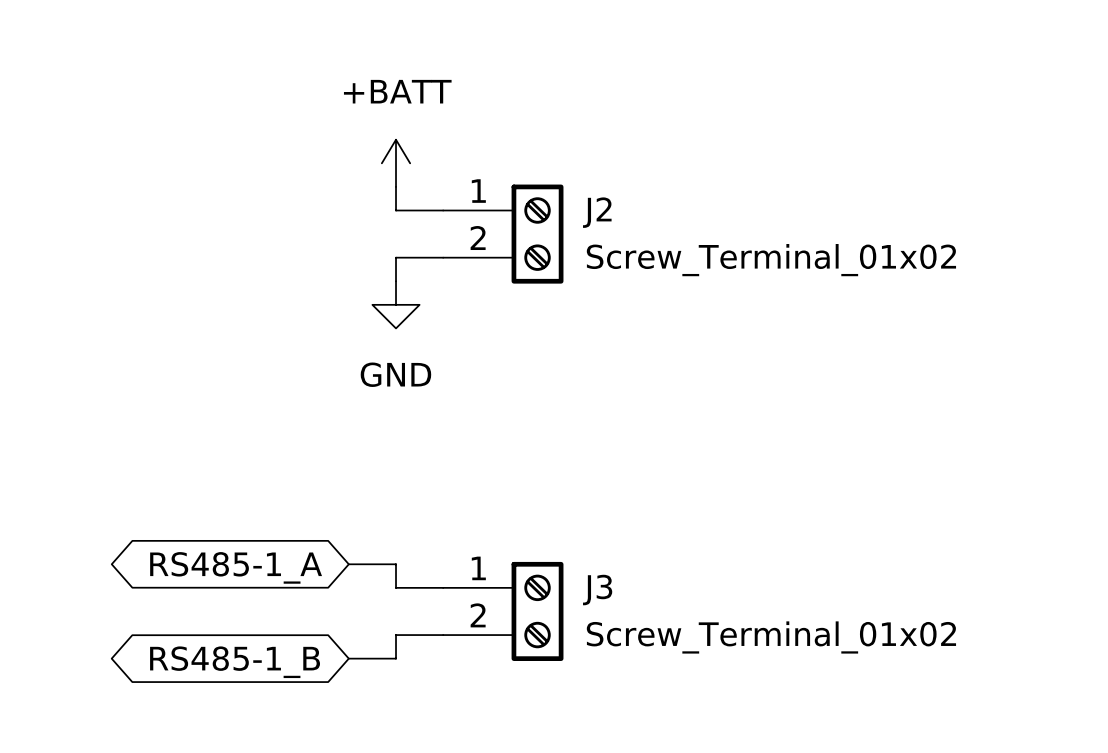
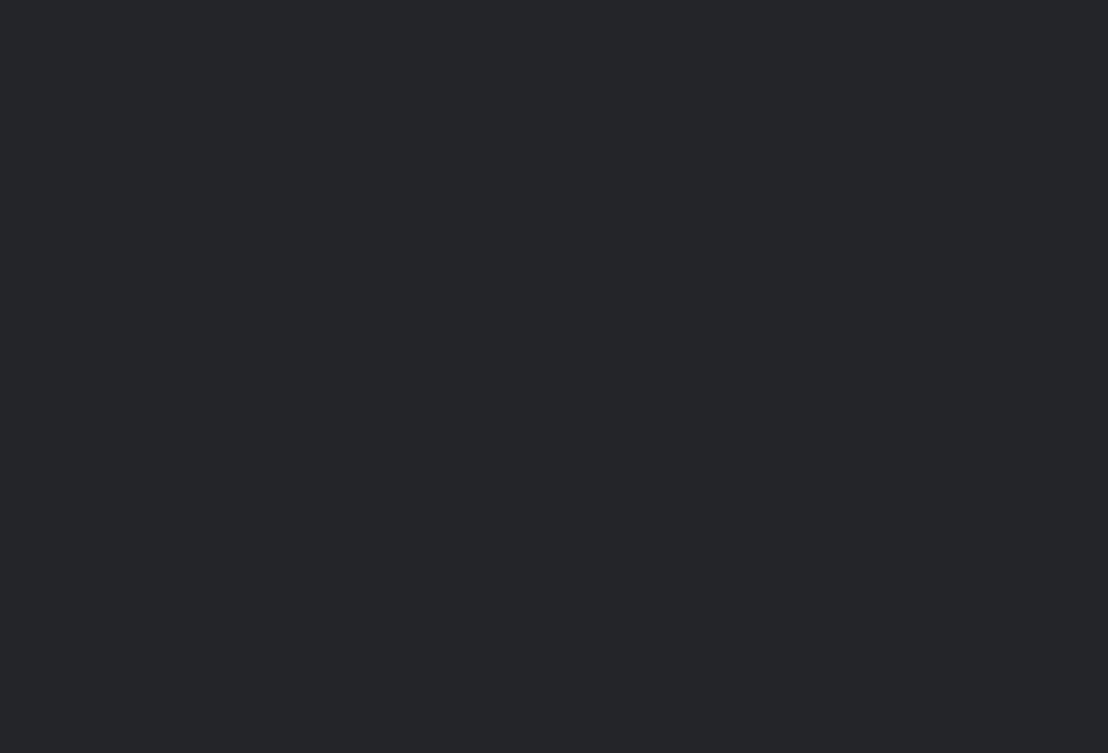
power symbol: +BATT (396, 163) -> none
wire: (396, 186) (396, 210) (443, 210) -> none
J2: Screw_Terminal_01x02 (503, 234) -> none
wire: (443, 257) (396, 257) (396, 281) -> none
power symbol: GND (396, 304) -> none
wire: (348, 564) (396, 564) (396, 587) (443, 587) -> none
global label: RS485-1_A (236, 567) -> none
J3: Screw_Terminal_01x02 (503, 611) -> none
wire: (443, 635) (396, 635) (396, 658) (348, 658) -> none
global label: RS485-1_B (235, 662) -> none

